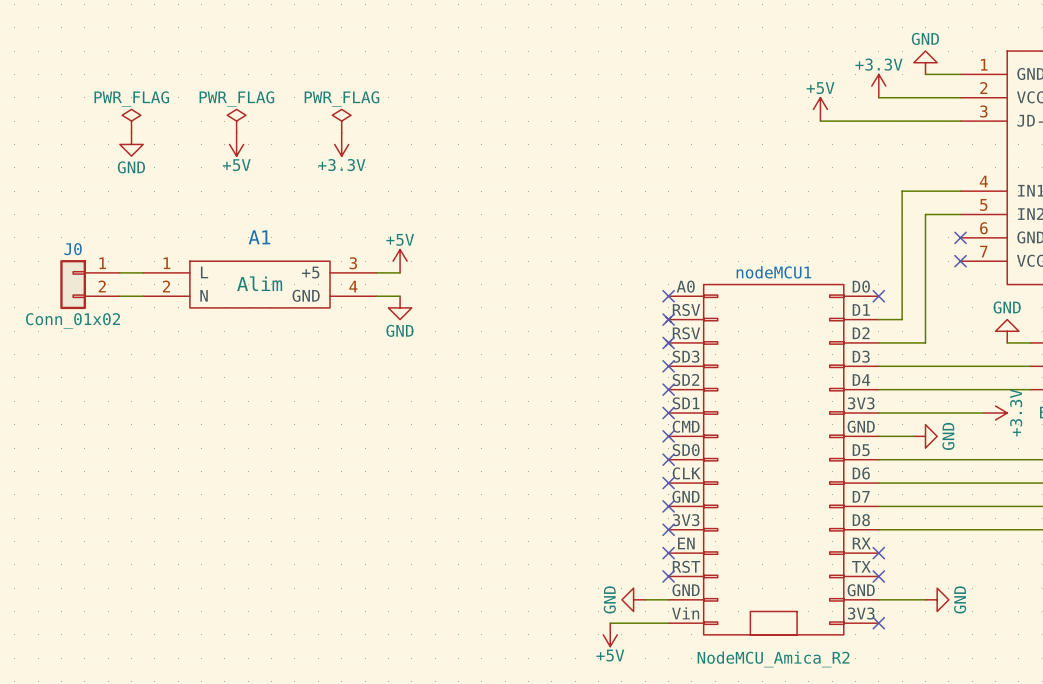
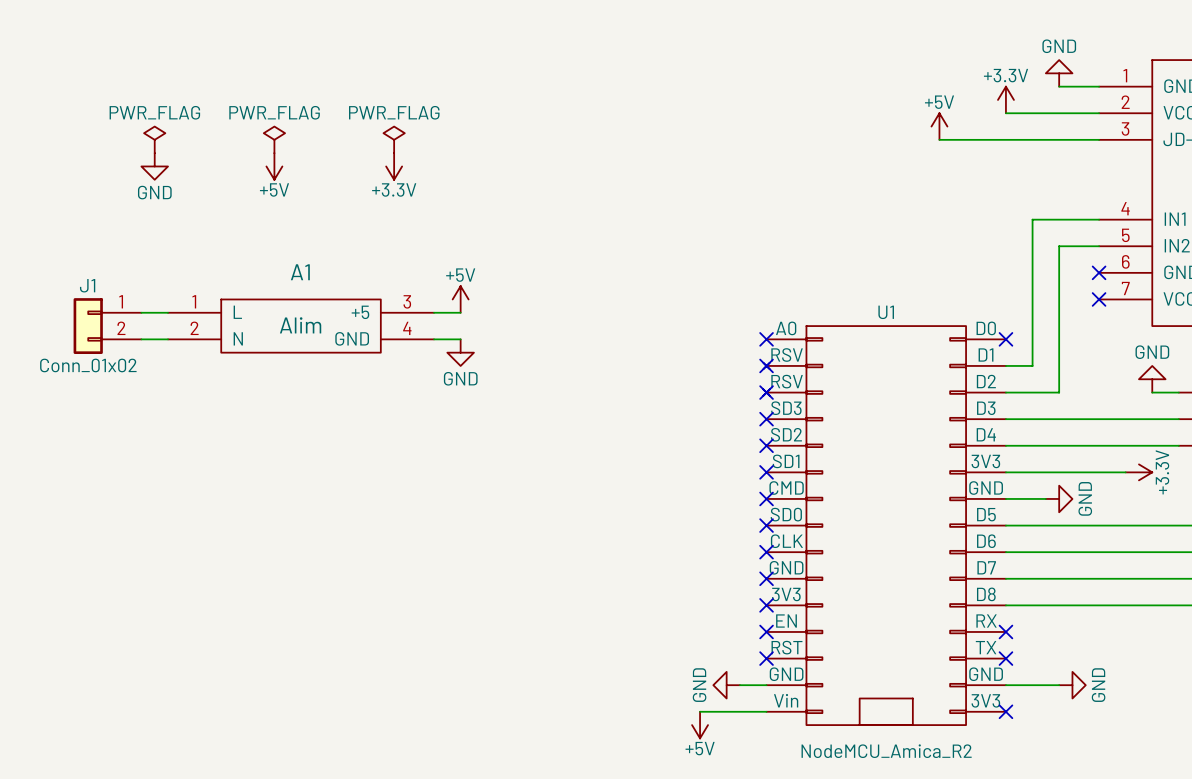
J0 name: J0 (73, 249) -> J1 (87, 285)
nodeMCU1 name: nodeMCU1 (773, 272) -> U1 (886, 312)

